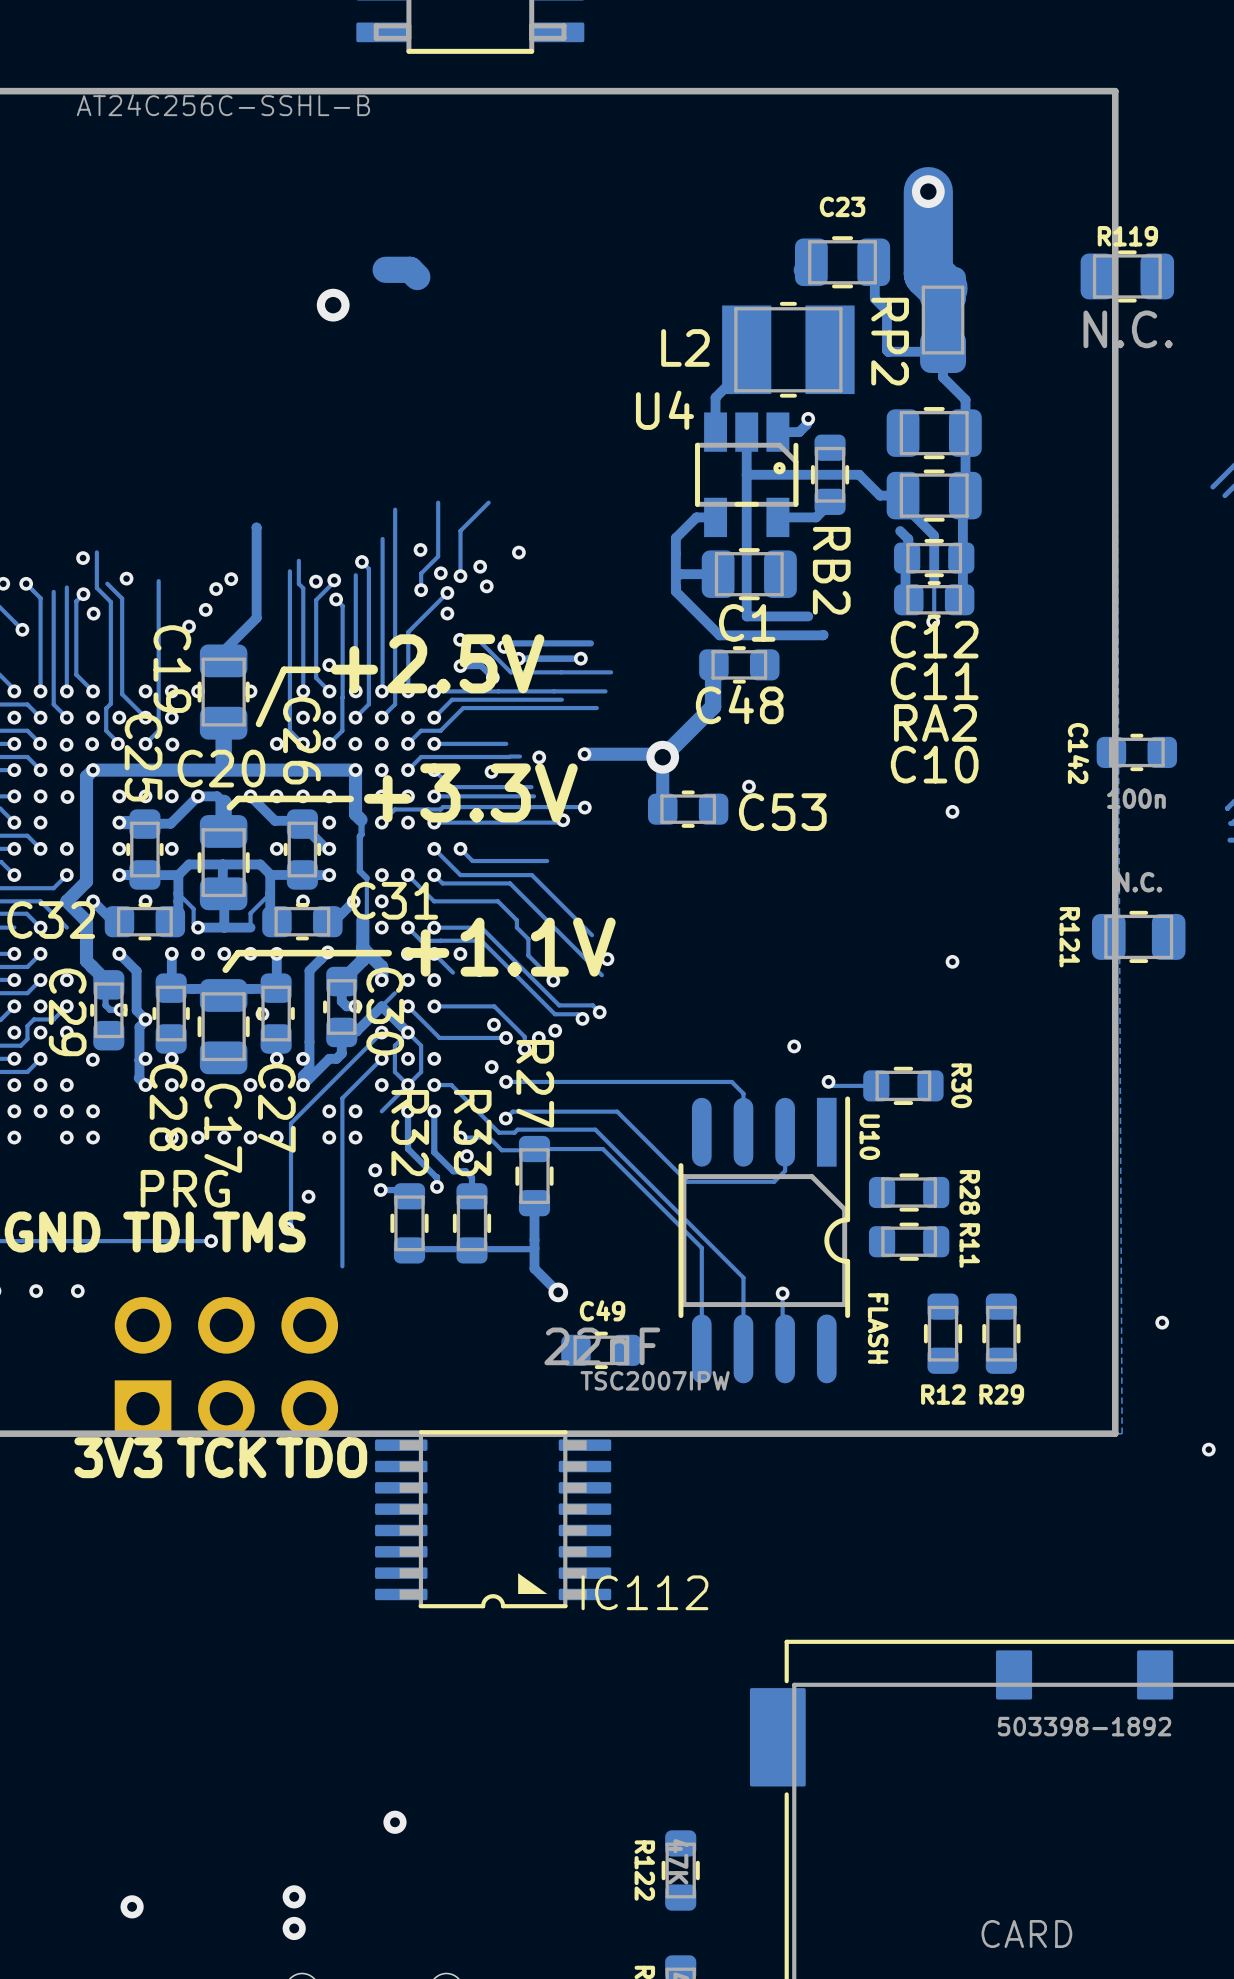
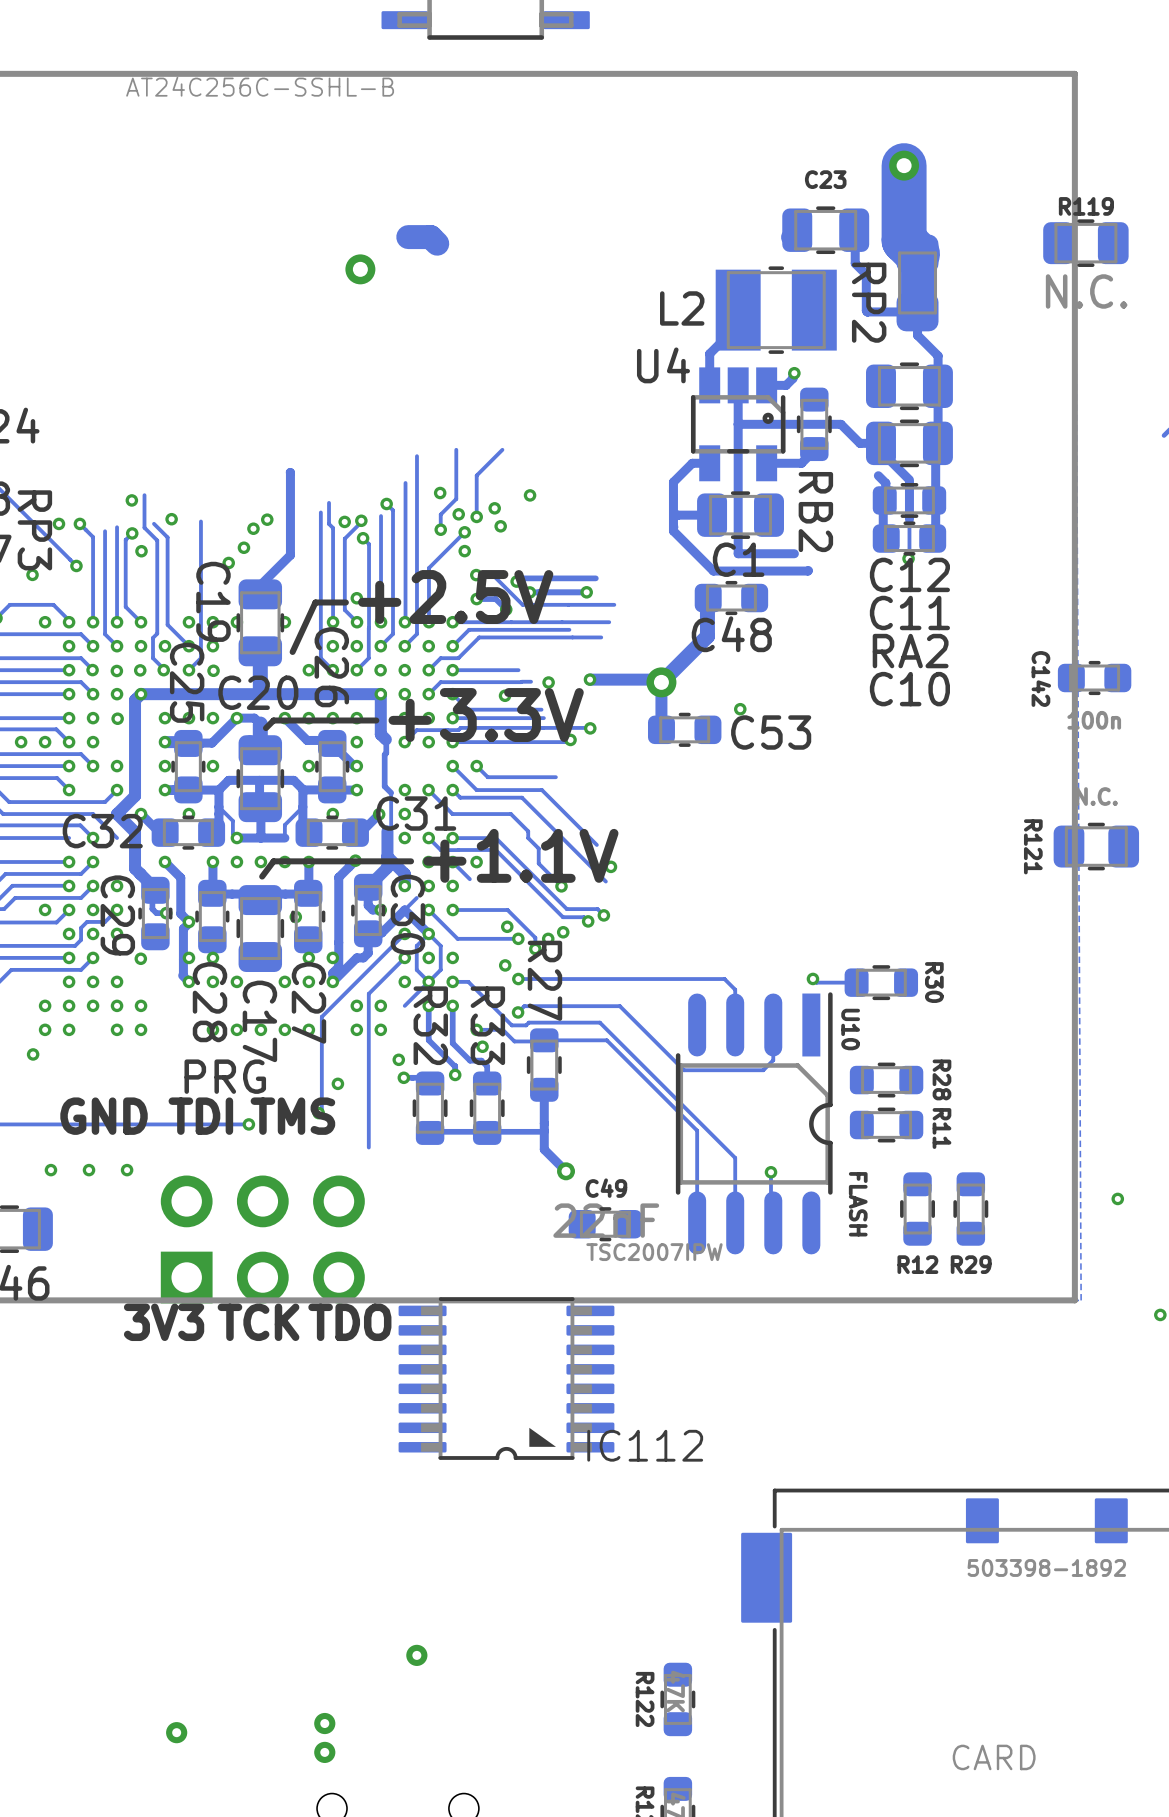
via: (952, 811) -> none
via: (952, 961) -> none
via: (794, 1046) -> none

